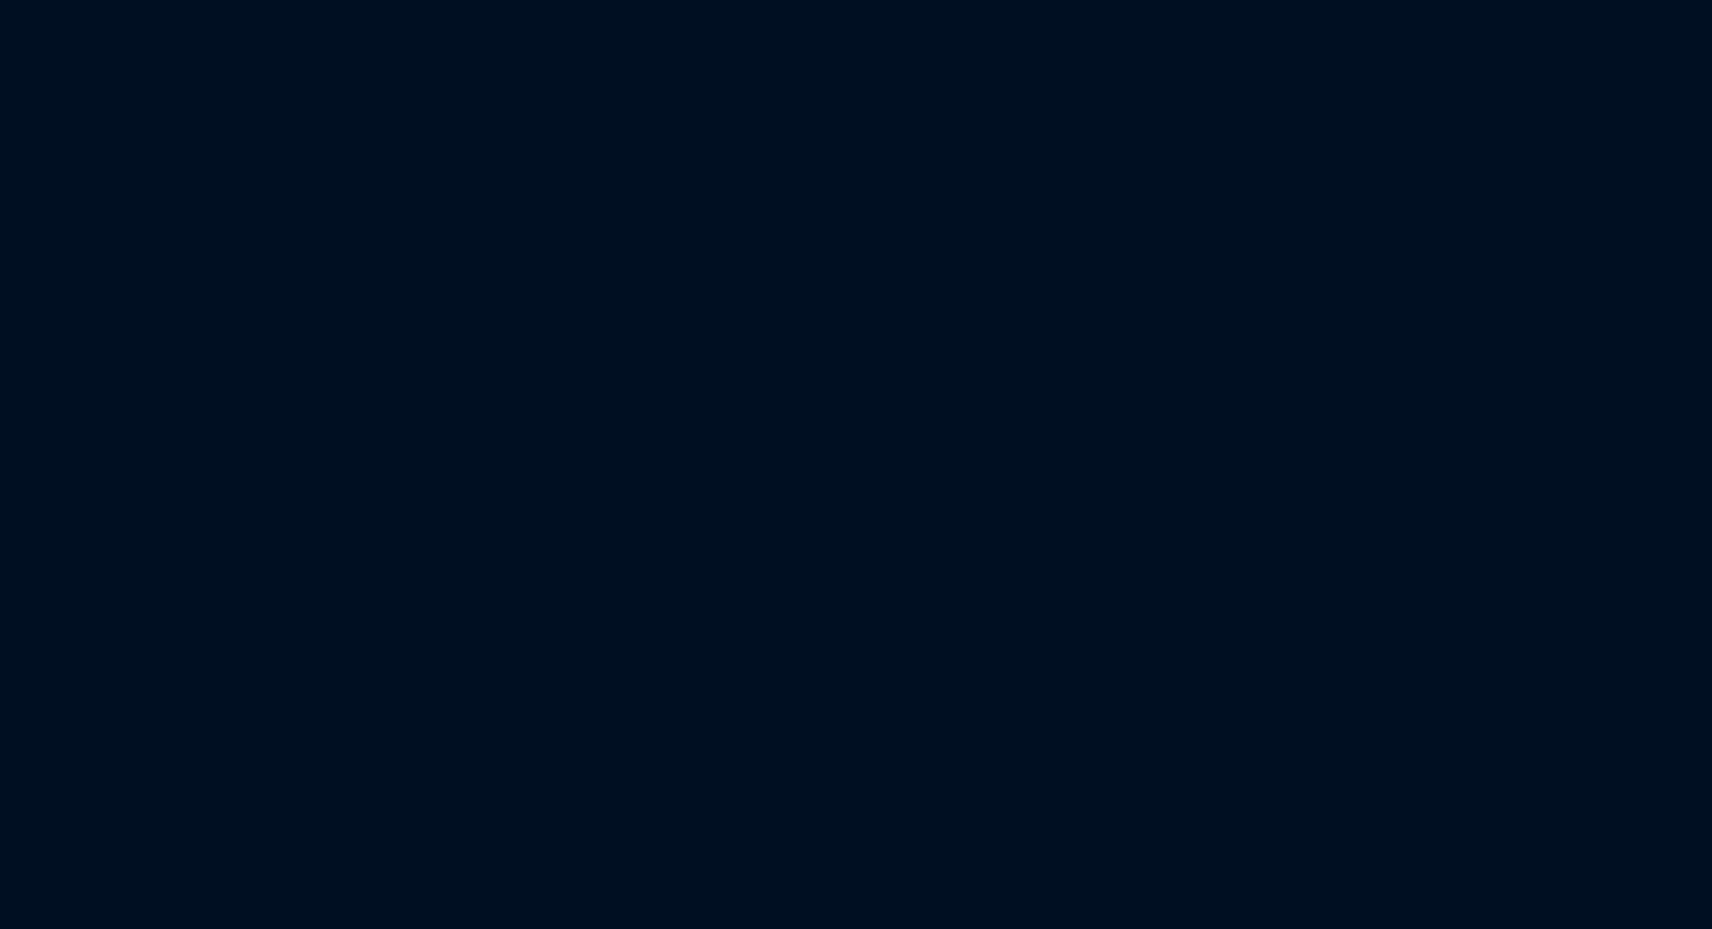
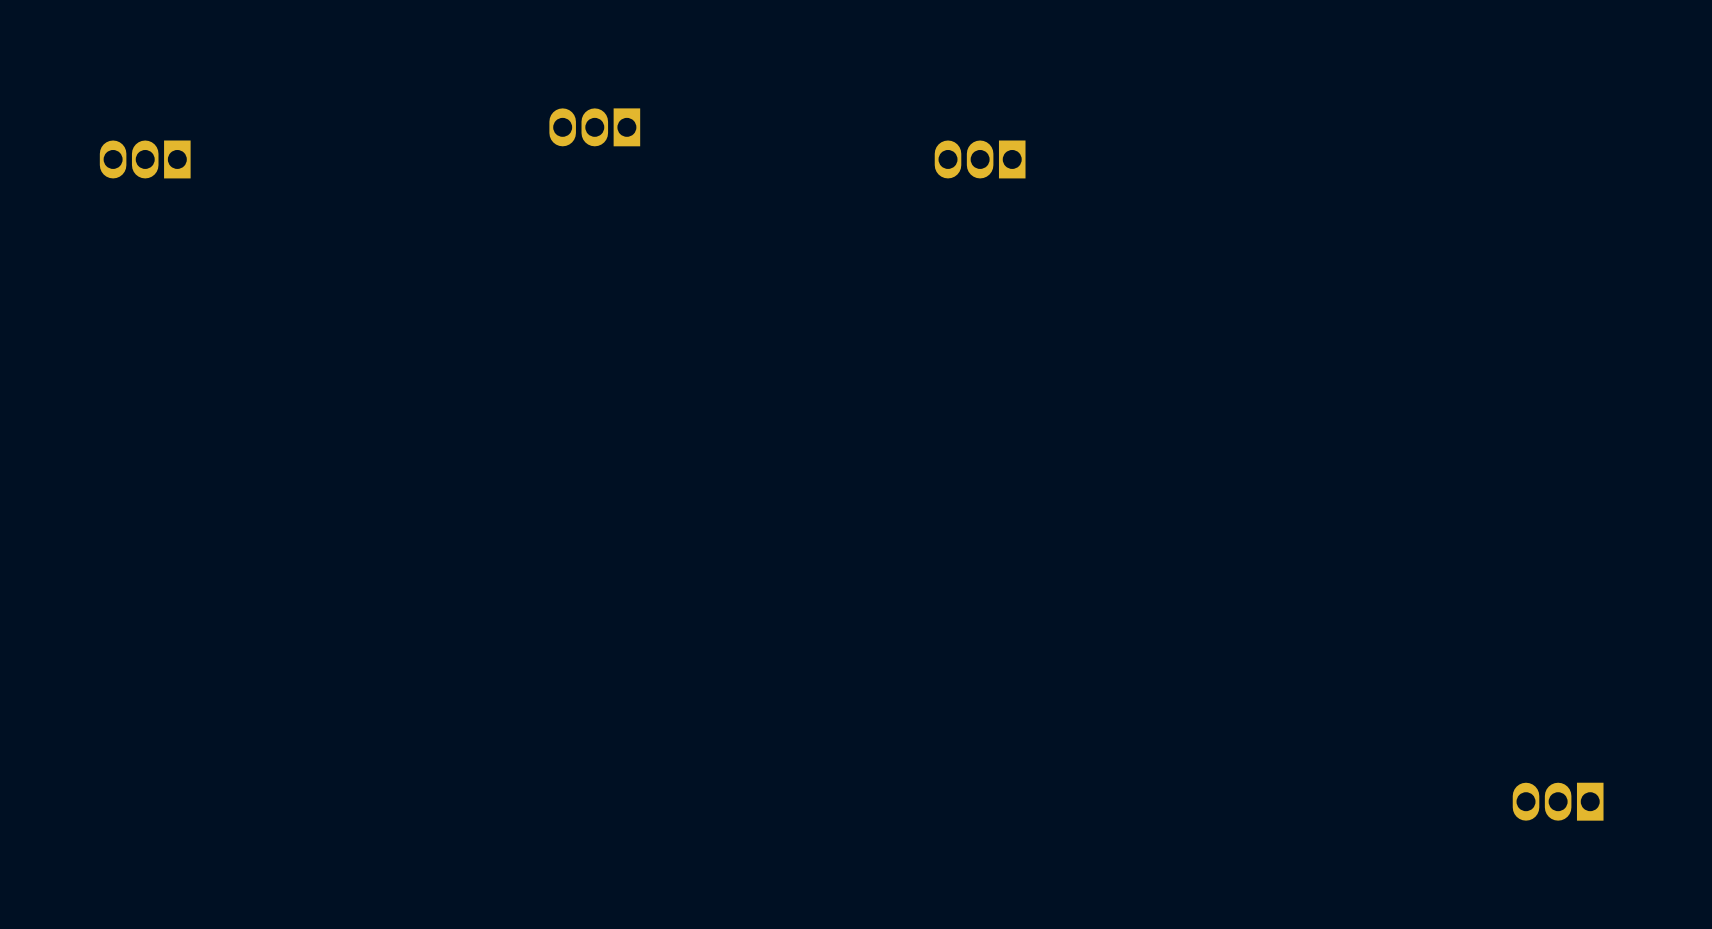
part: none -> (594, 127)
part: none -> (145, 159)
part: none -> (980, 159)
part: none -> (1558, 801)

